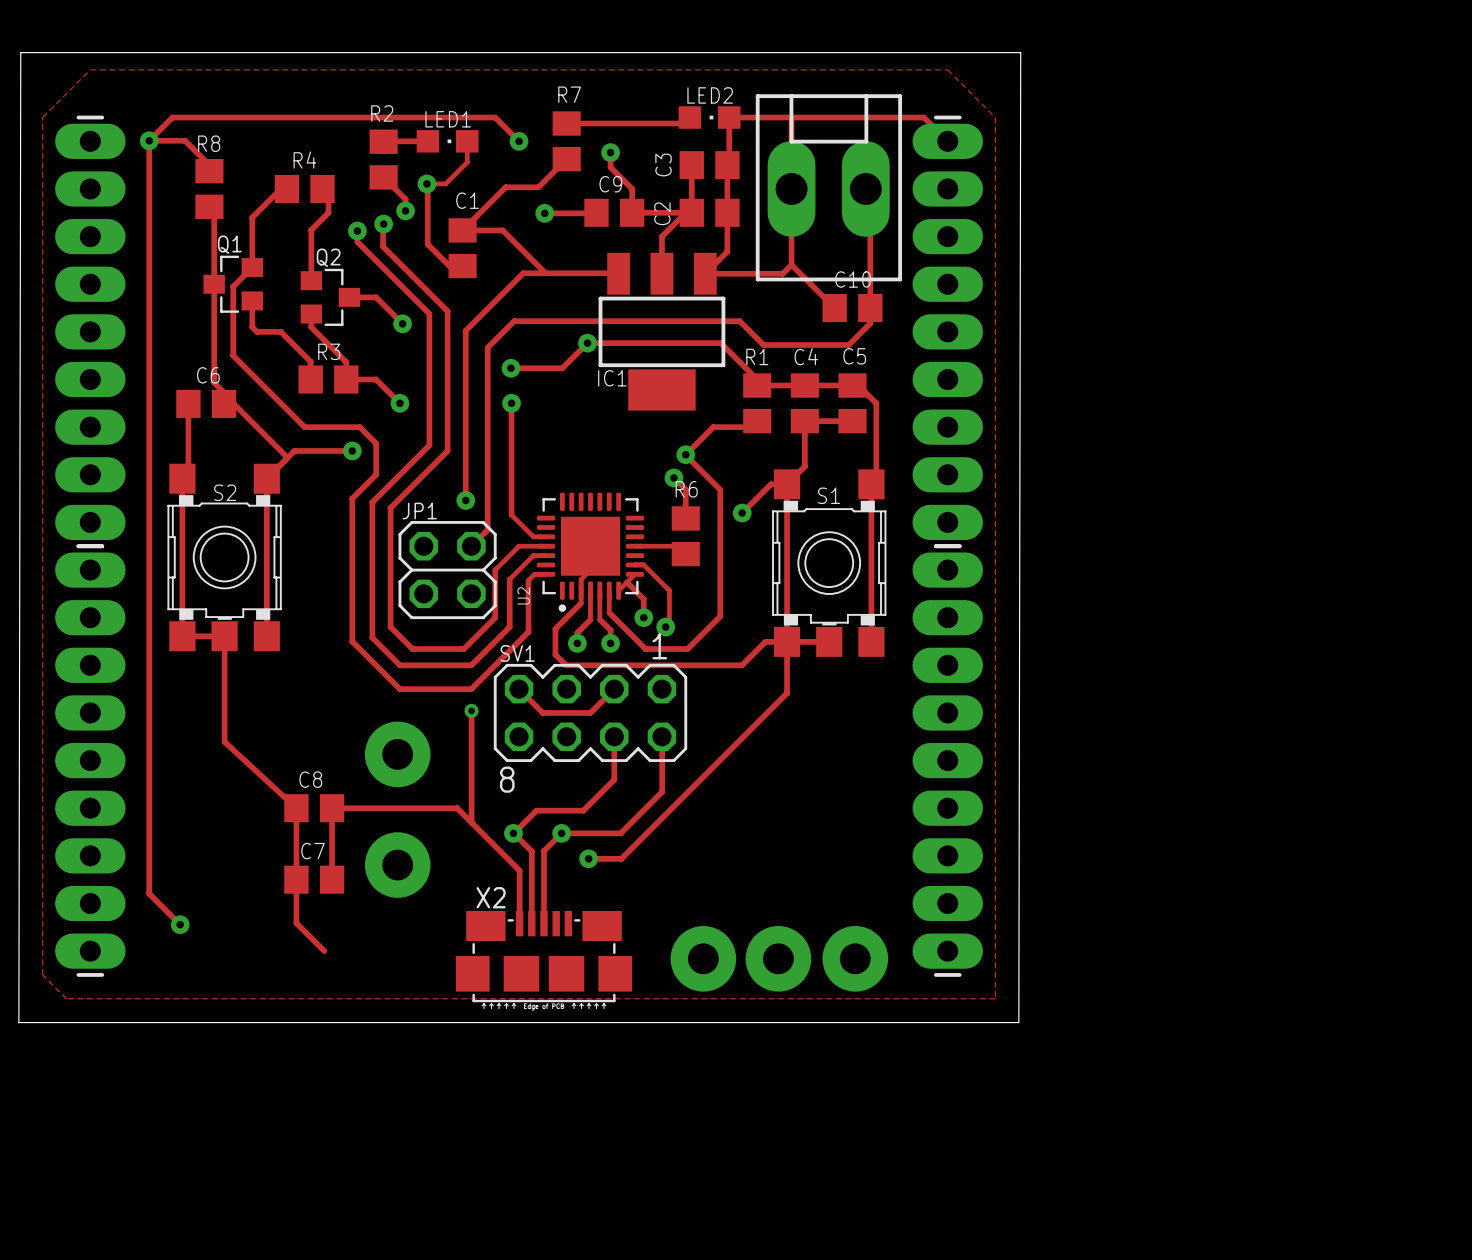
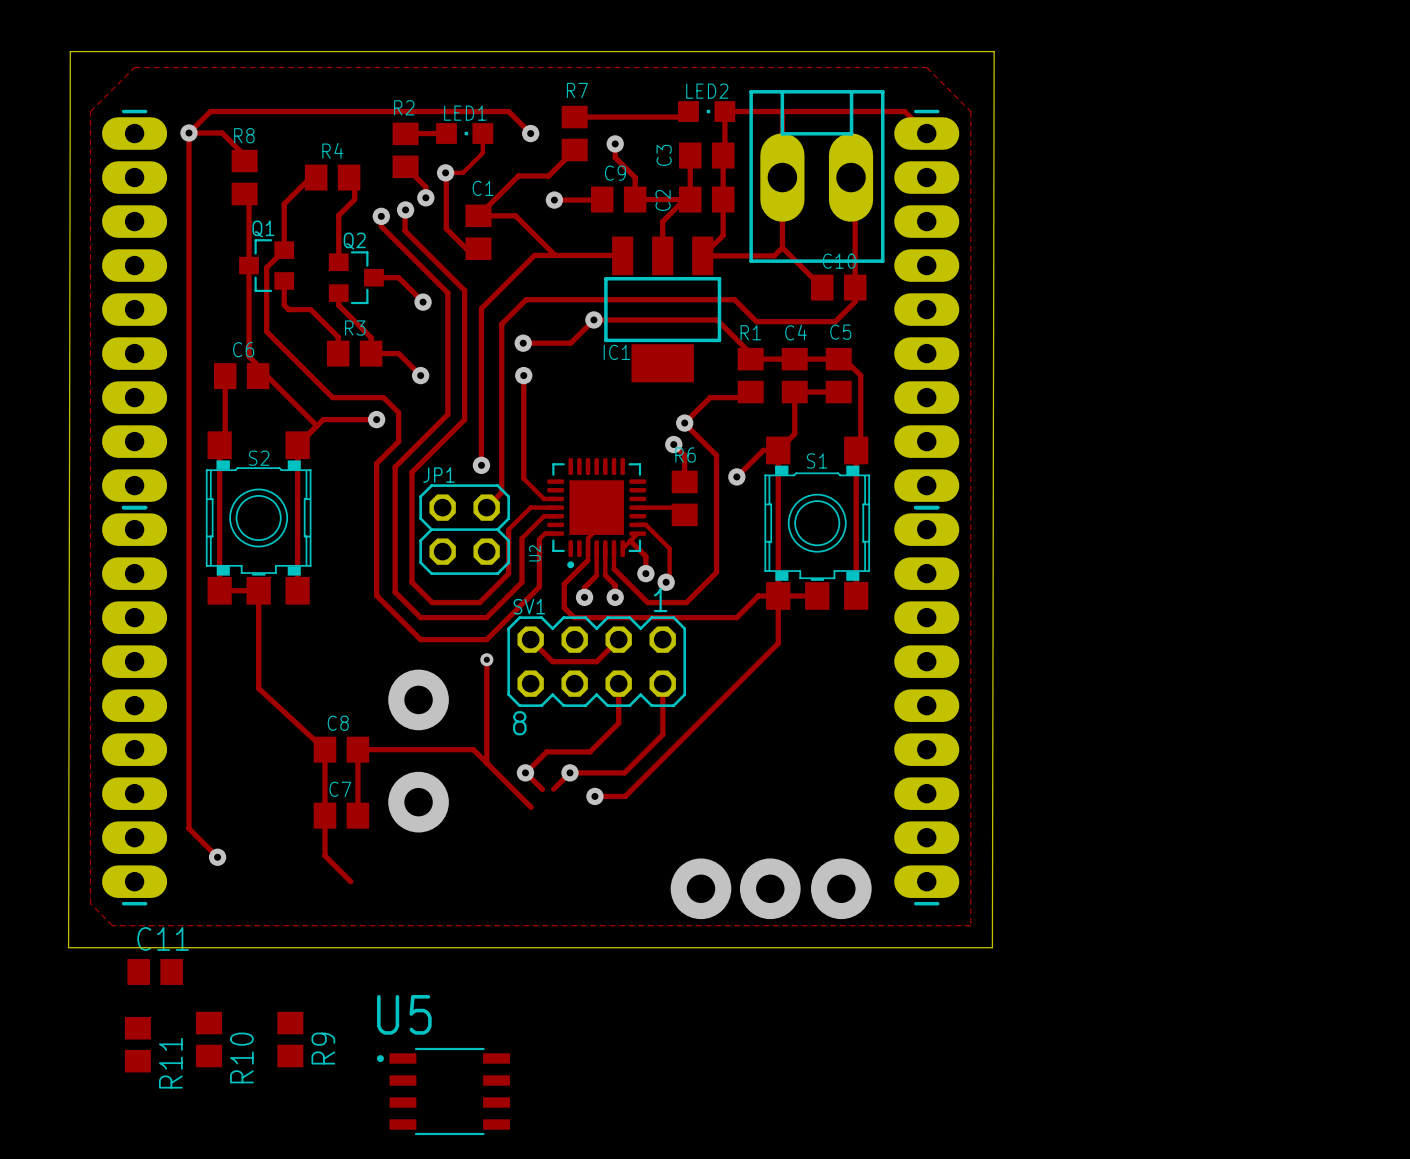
track: (543, 850) (543, 923) -> none
track: (531, 851) (531, 923) -> none
track: (519, 870) (519, 923) -> none
X2: (543, 959) -> none
C11: none -> (155, 971)
R10: none -> (208, 1039)
R9: none -> (290, 1039)
R11: none -> (137, 1044)
U5: none -> (443, 1091)

